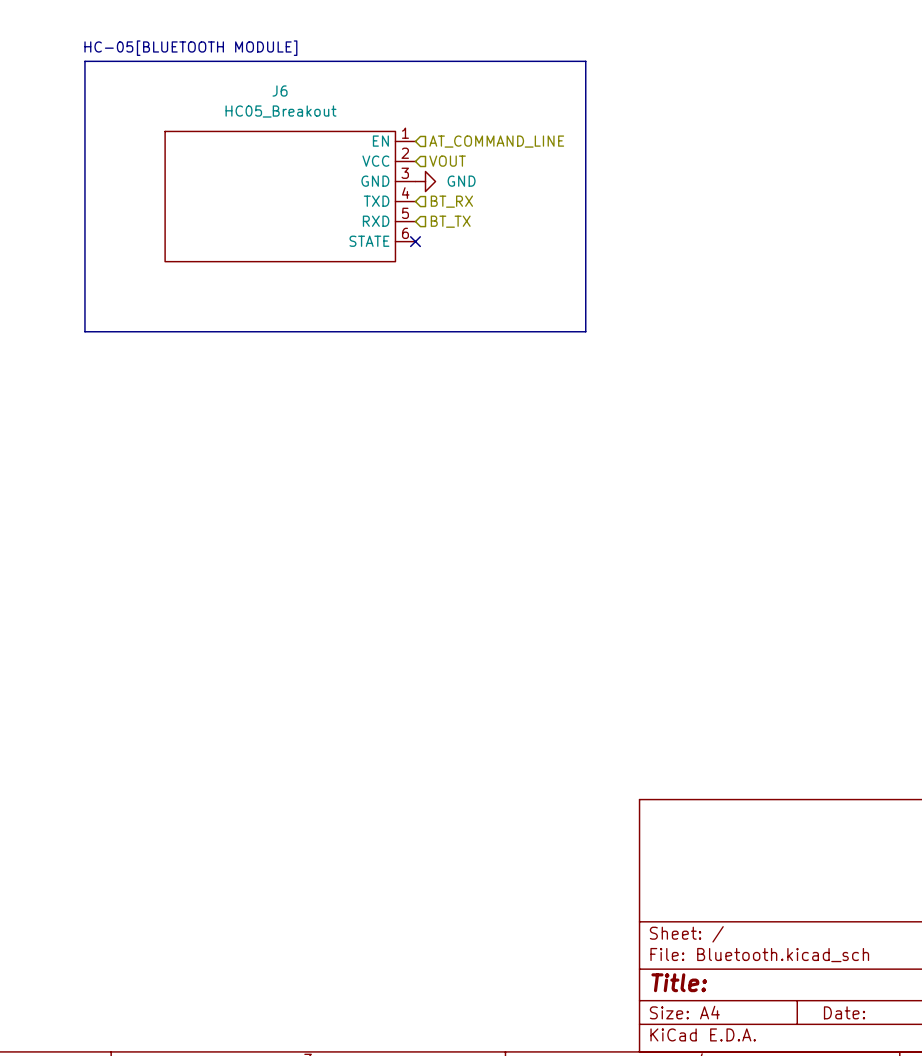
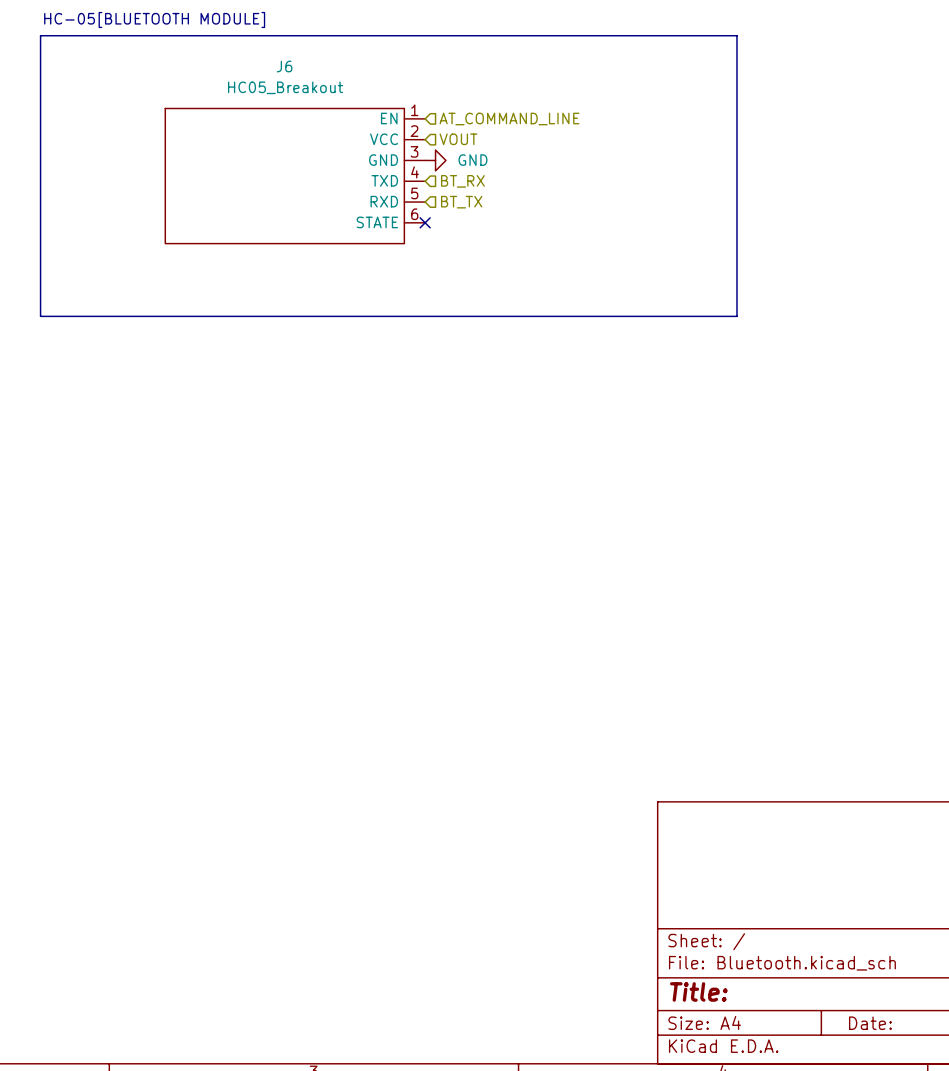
text position: HC-05[BLUETOOTH MODULE] (190, 48) -> HC-05[BLUETOOTH MODULE] (154, 19)
line: (84, 61) (84, 331) -> (82, 35) (40, 35) (40, 316) (82, 316)
line: (585, 61) (585, 331) -> (601, 35) (736, 35) (736, 316) (601, 316)

